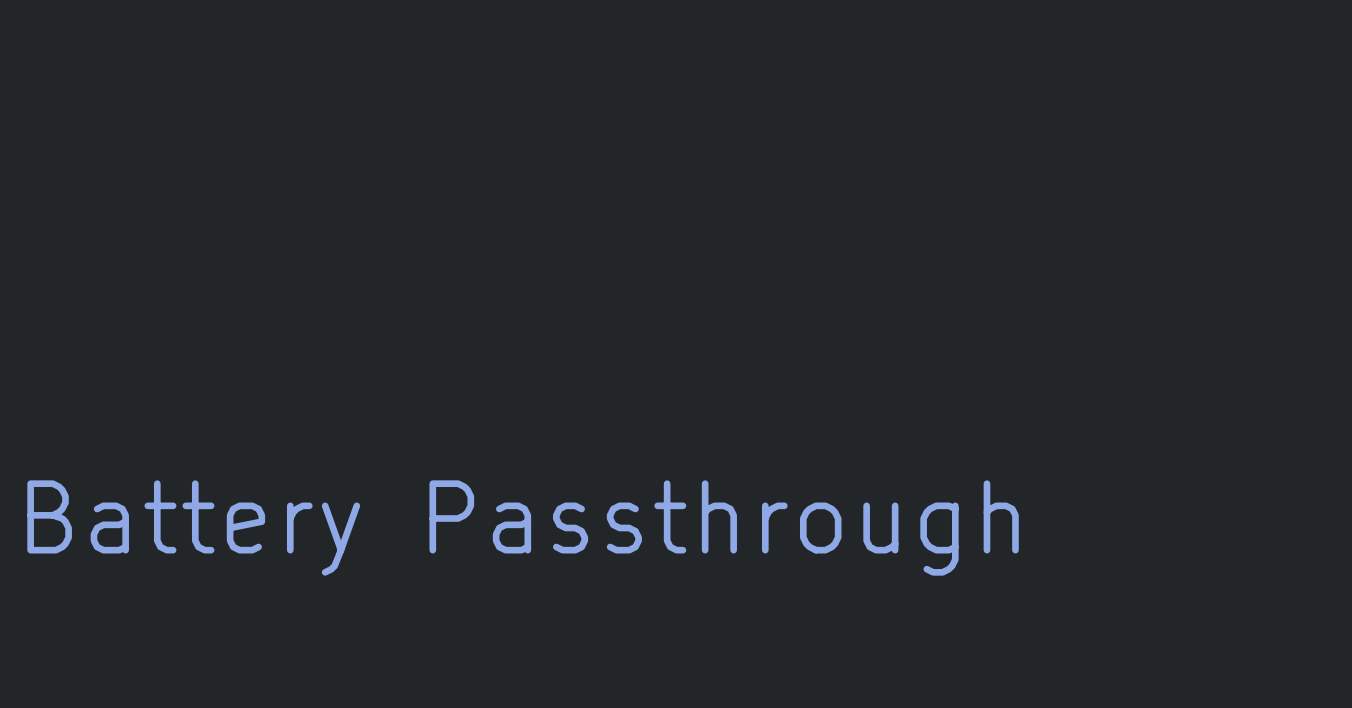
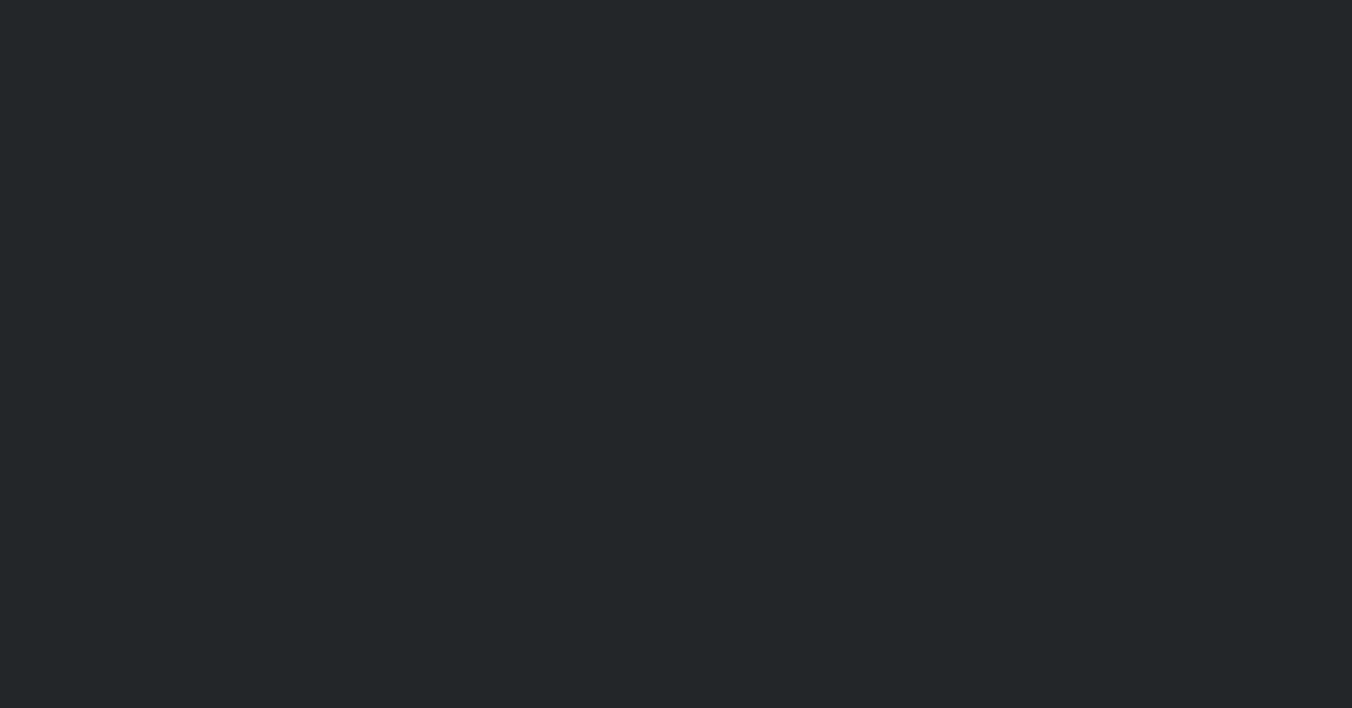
text: Battery Passthrough (523, 528) -> none

